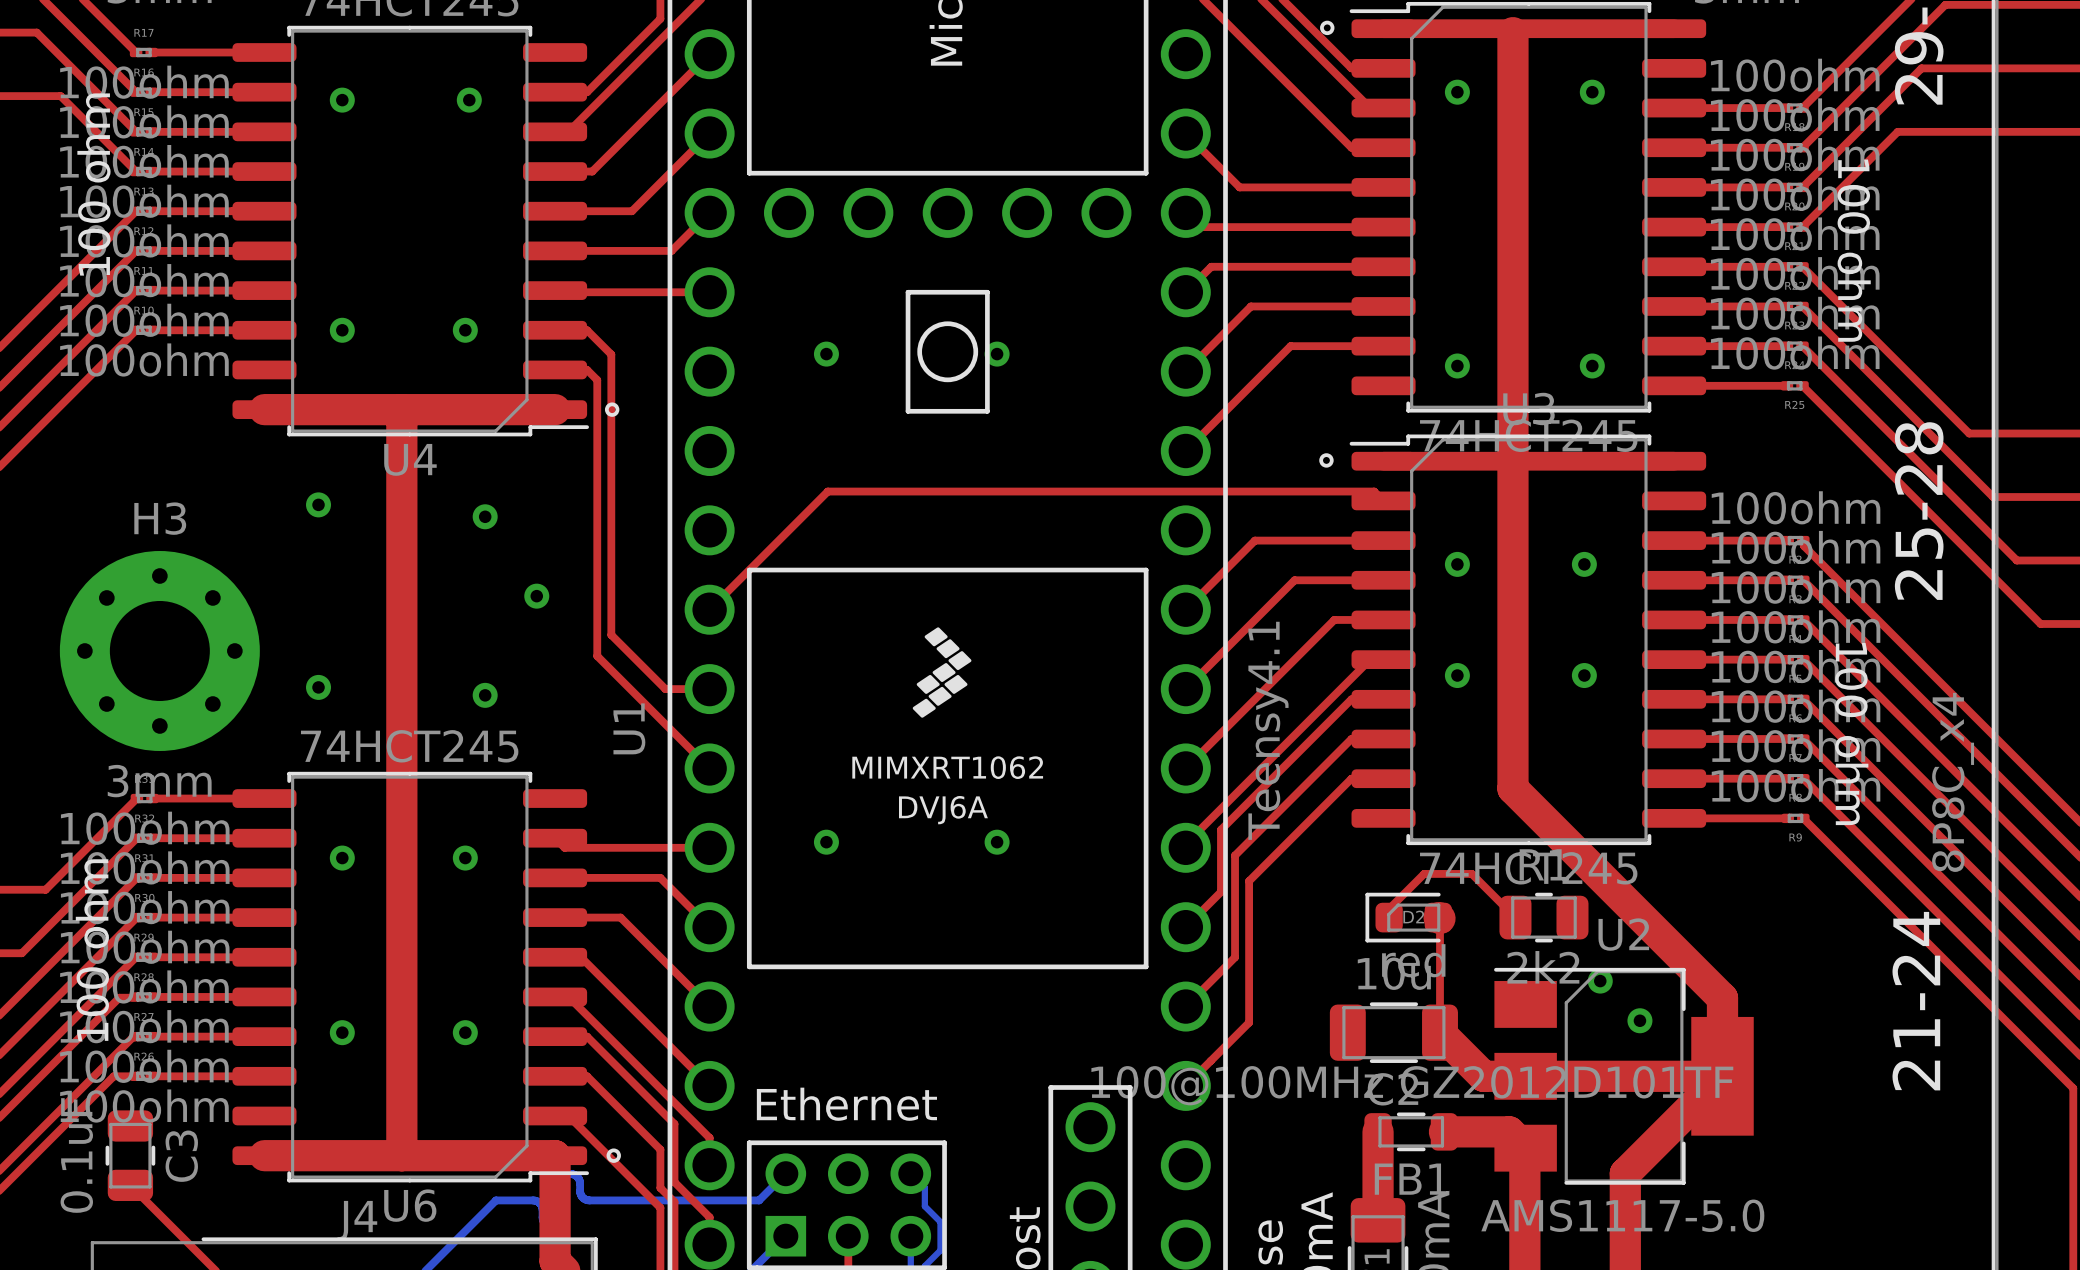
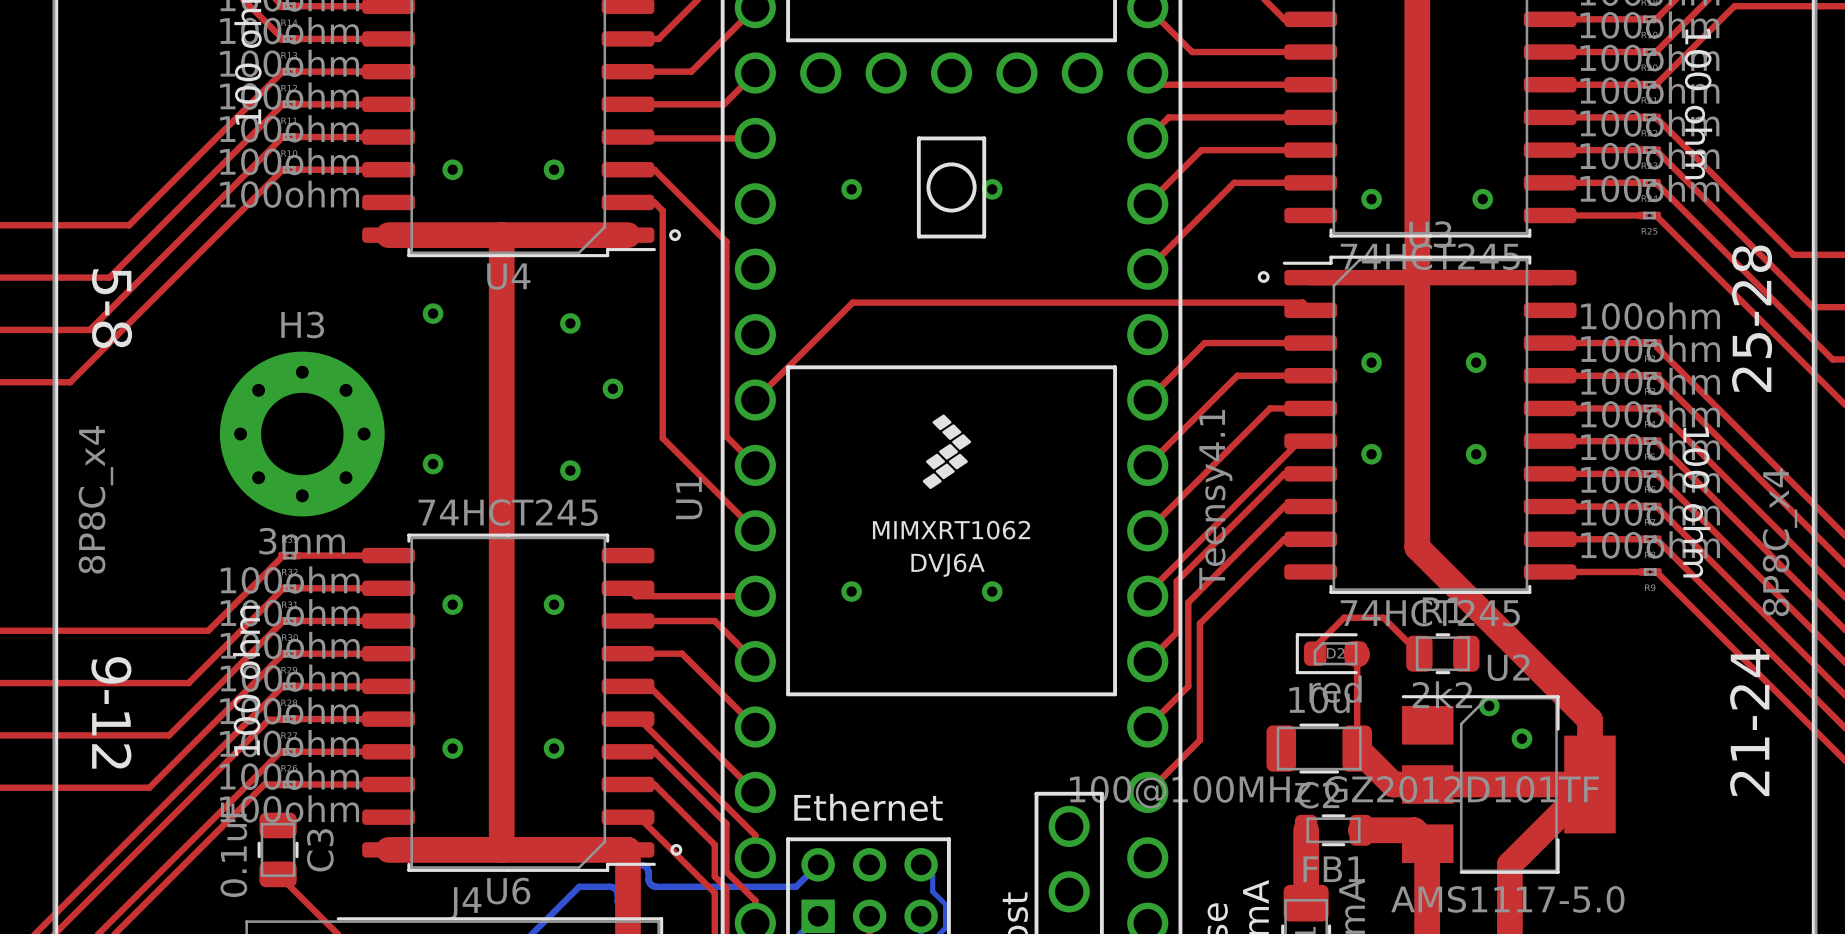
top track: (611, 354) (611, 634) (665, 689) (709, 689) -> (674, 189) (726, 241) (726, 436) (755, 465)

